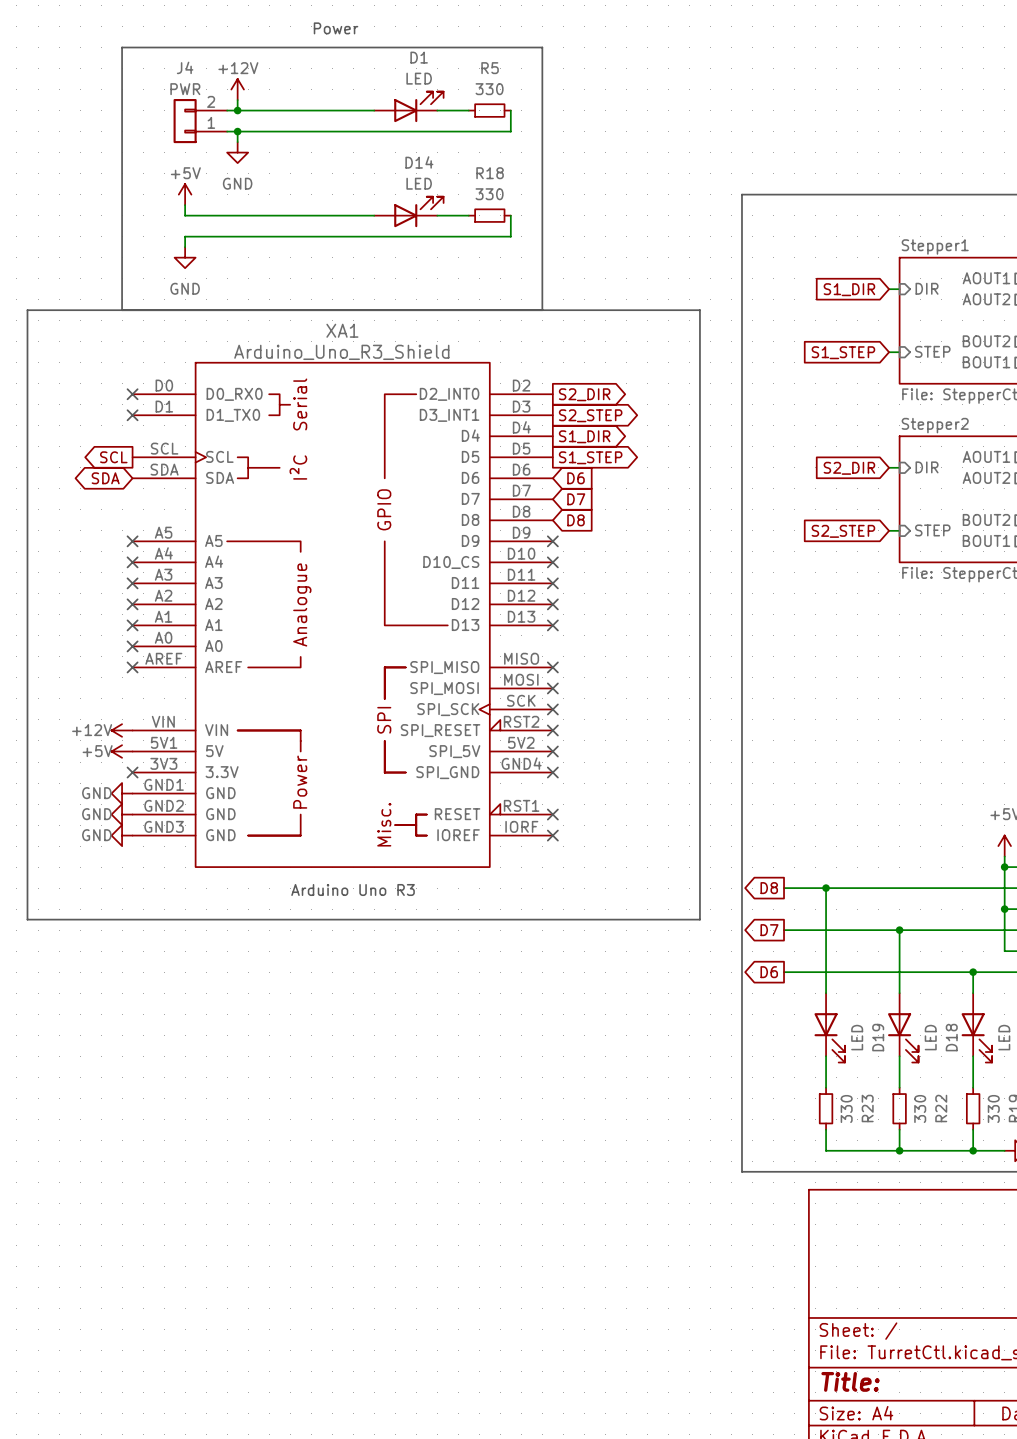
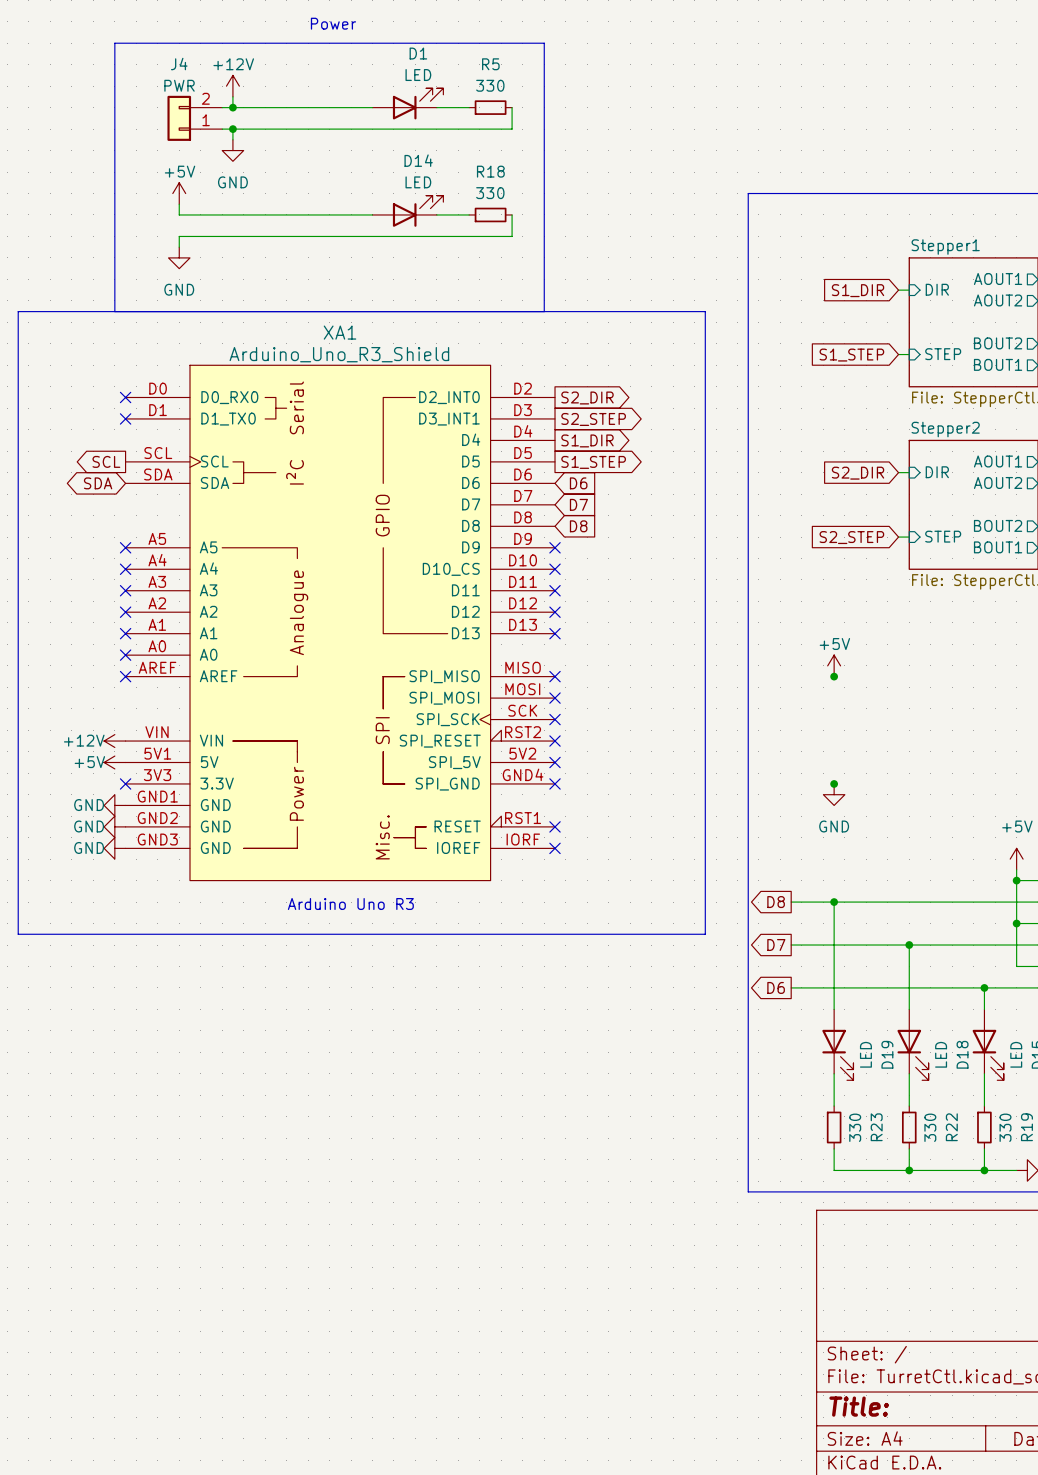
power symbol: none -> +5V (834, 665)
junction: none -> (834, 676)
junction: none -> (834, 783)
power symbol: none -> GND (834, 794)

